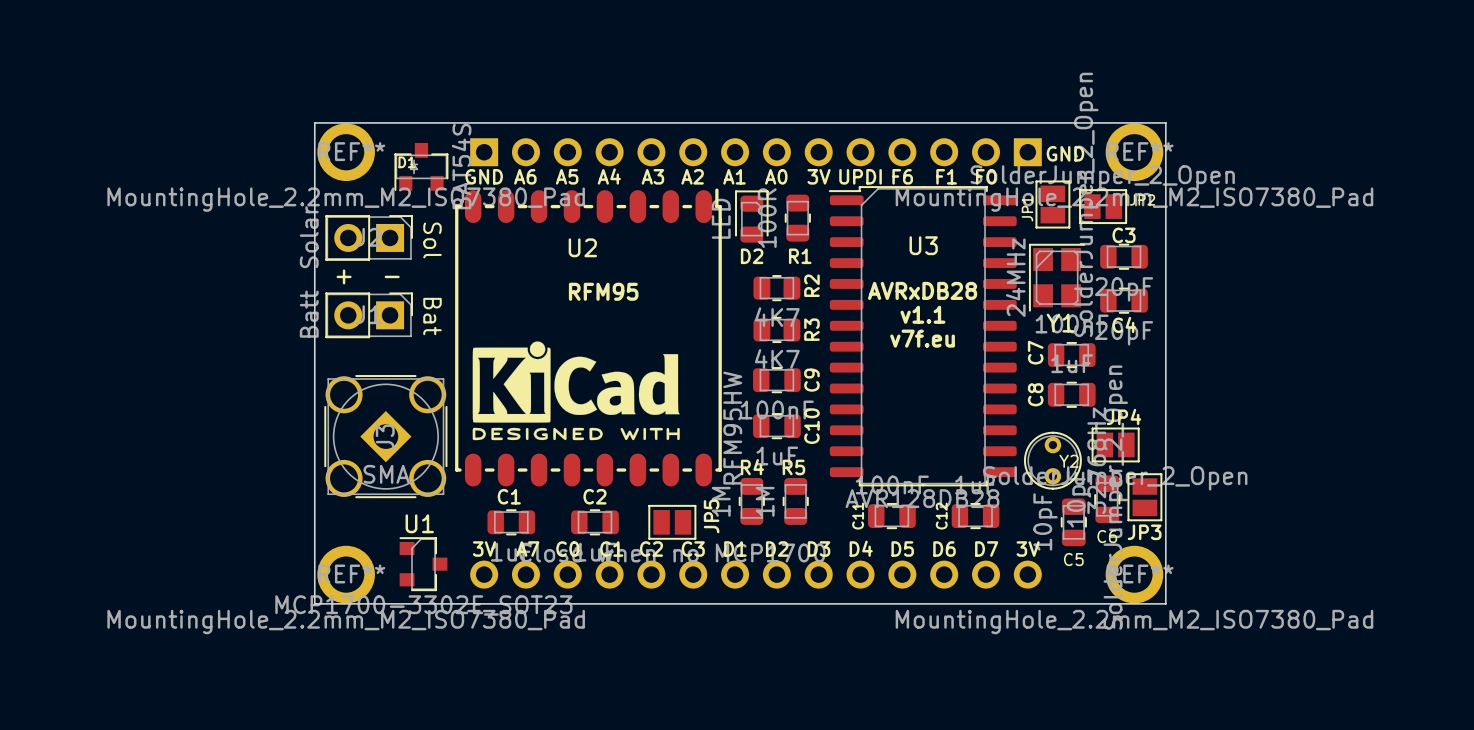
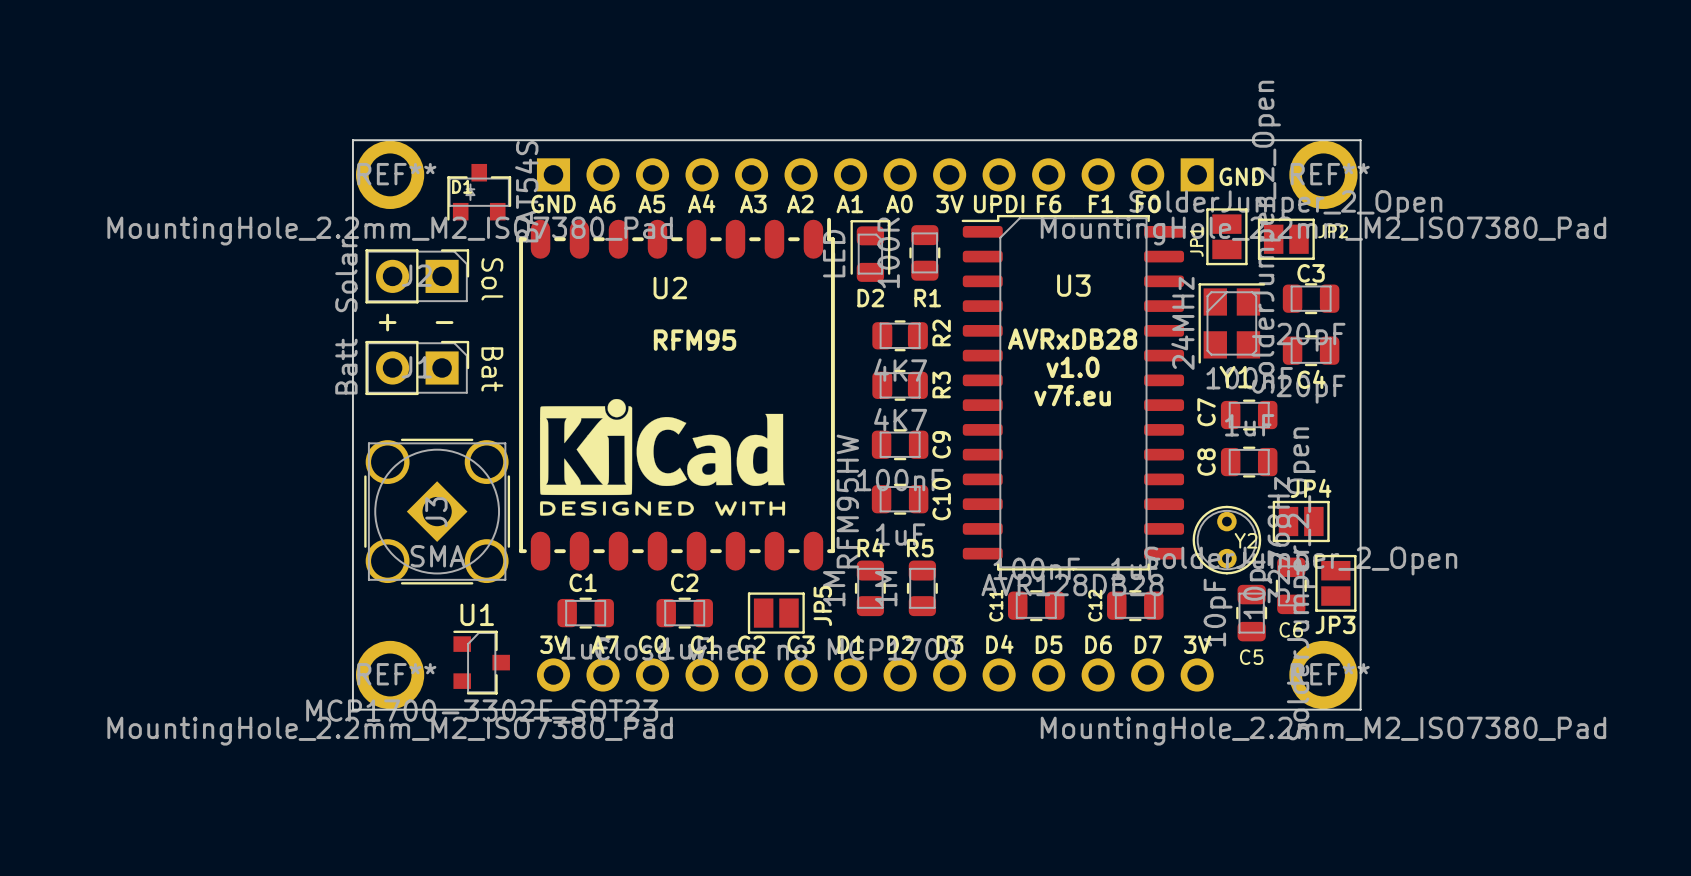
text: v1.1 (922, 314) -> v1.0 (1072, 367)

